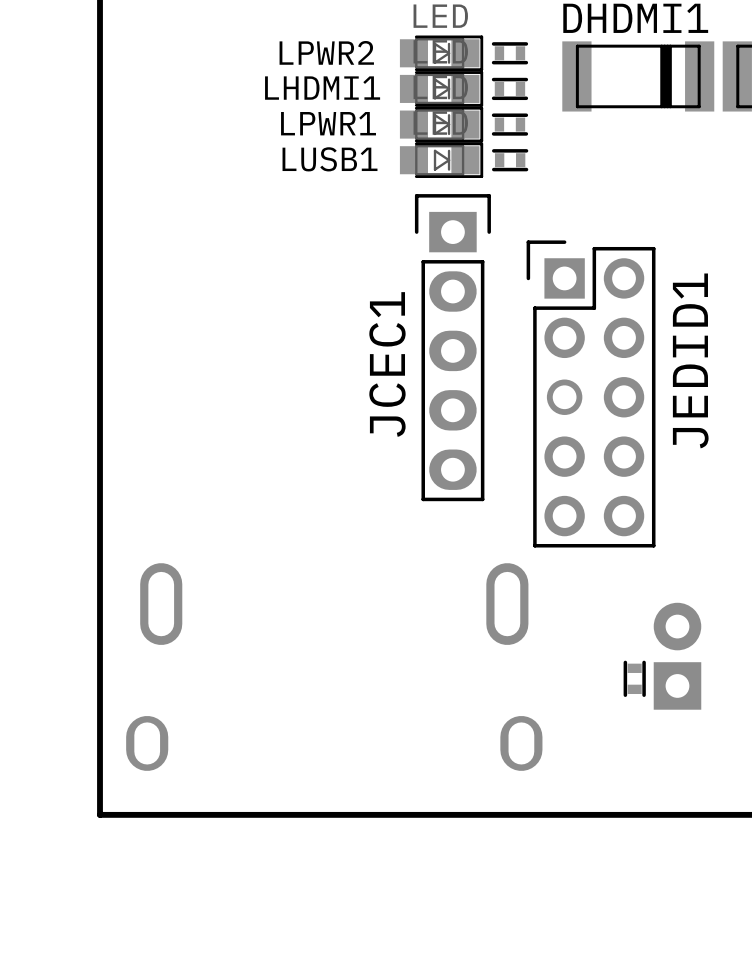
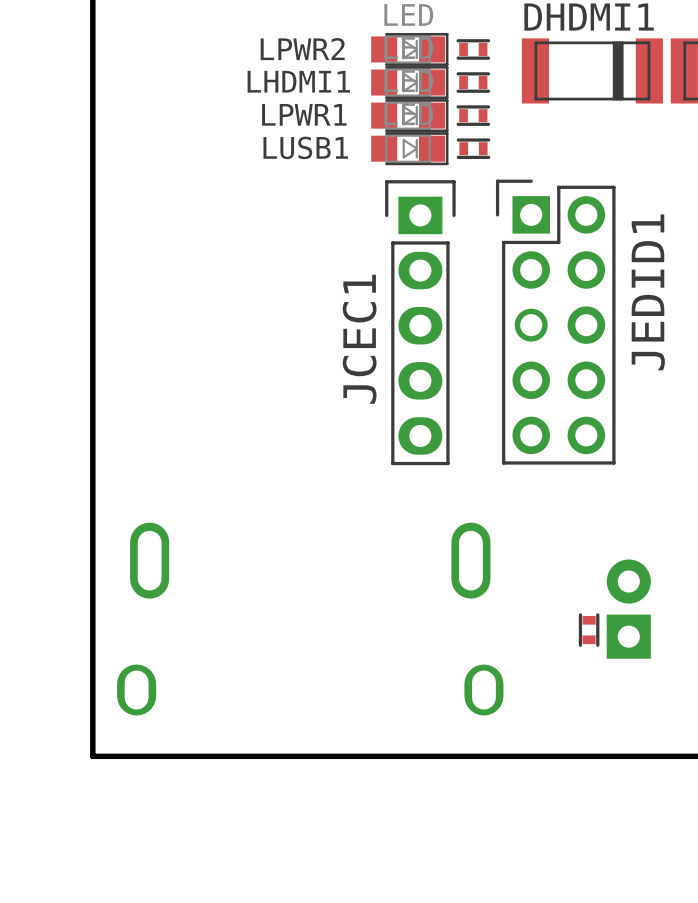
JEDID1 position: (591, 393) -> (555, 322)

